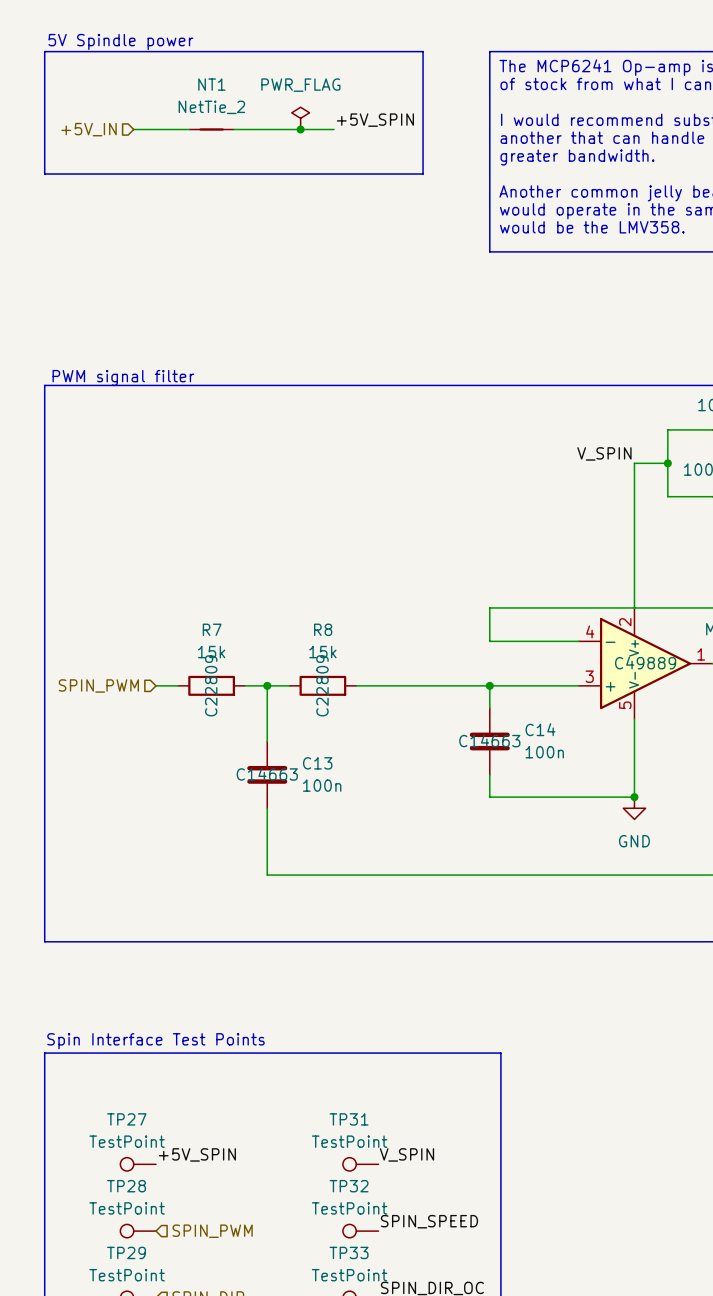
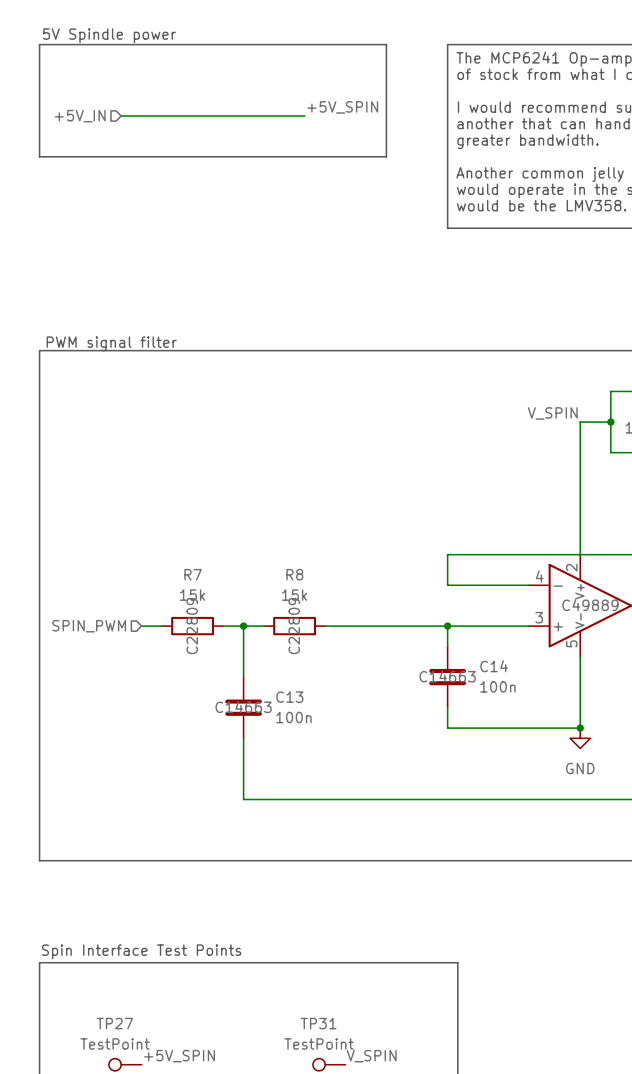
power symbol: PWR_FLAG (300, 118) -> none
NT1: NetTie_2 (211, 129) -> none
junction: (300, 129) -> none

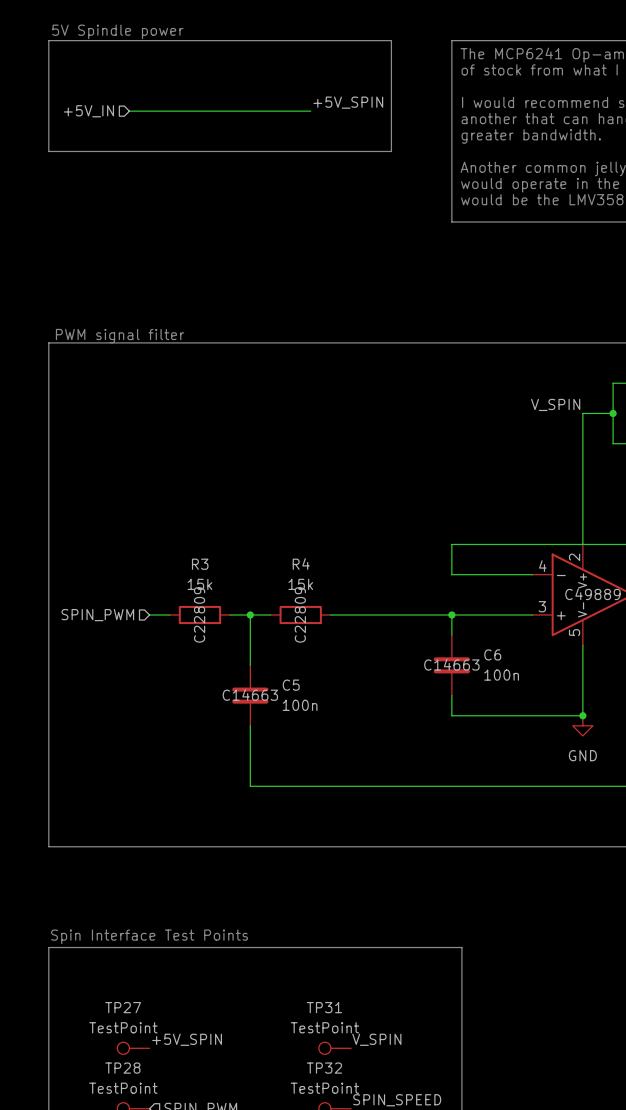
R7 name: R7 (193, 574) -> R3 (200, 564)
R8 name: R8 (294, 574) -> R4 (301, 563)
C14 name: C14 (494, 666) -> C6 (492, 654)
C13 name: C13 (289, 697) -> C5 (291, 685)

